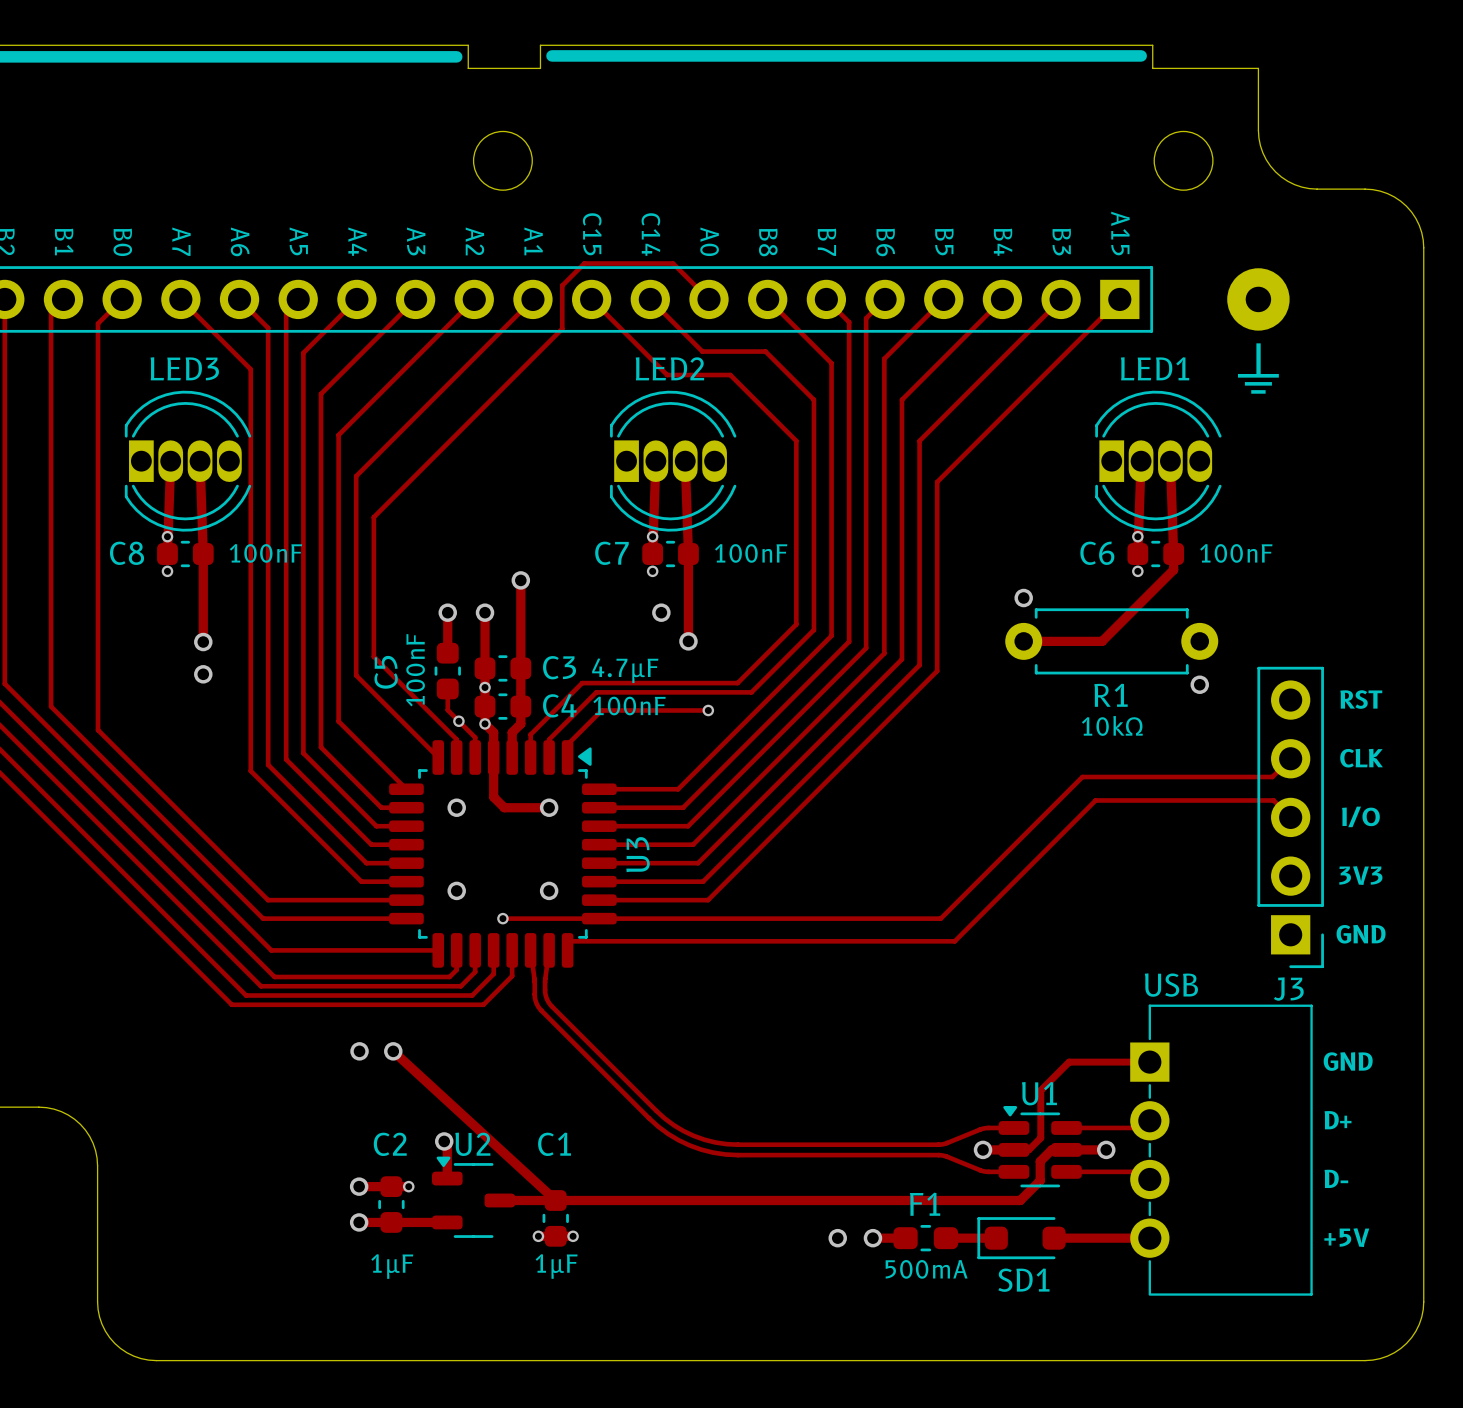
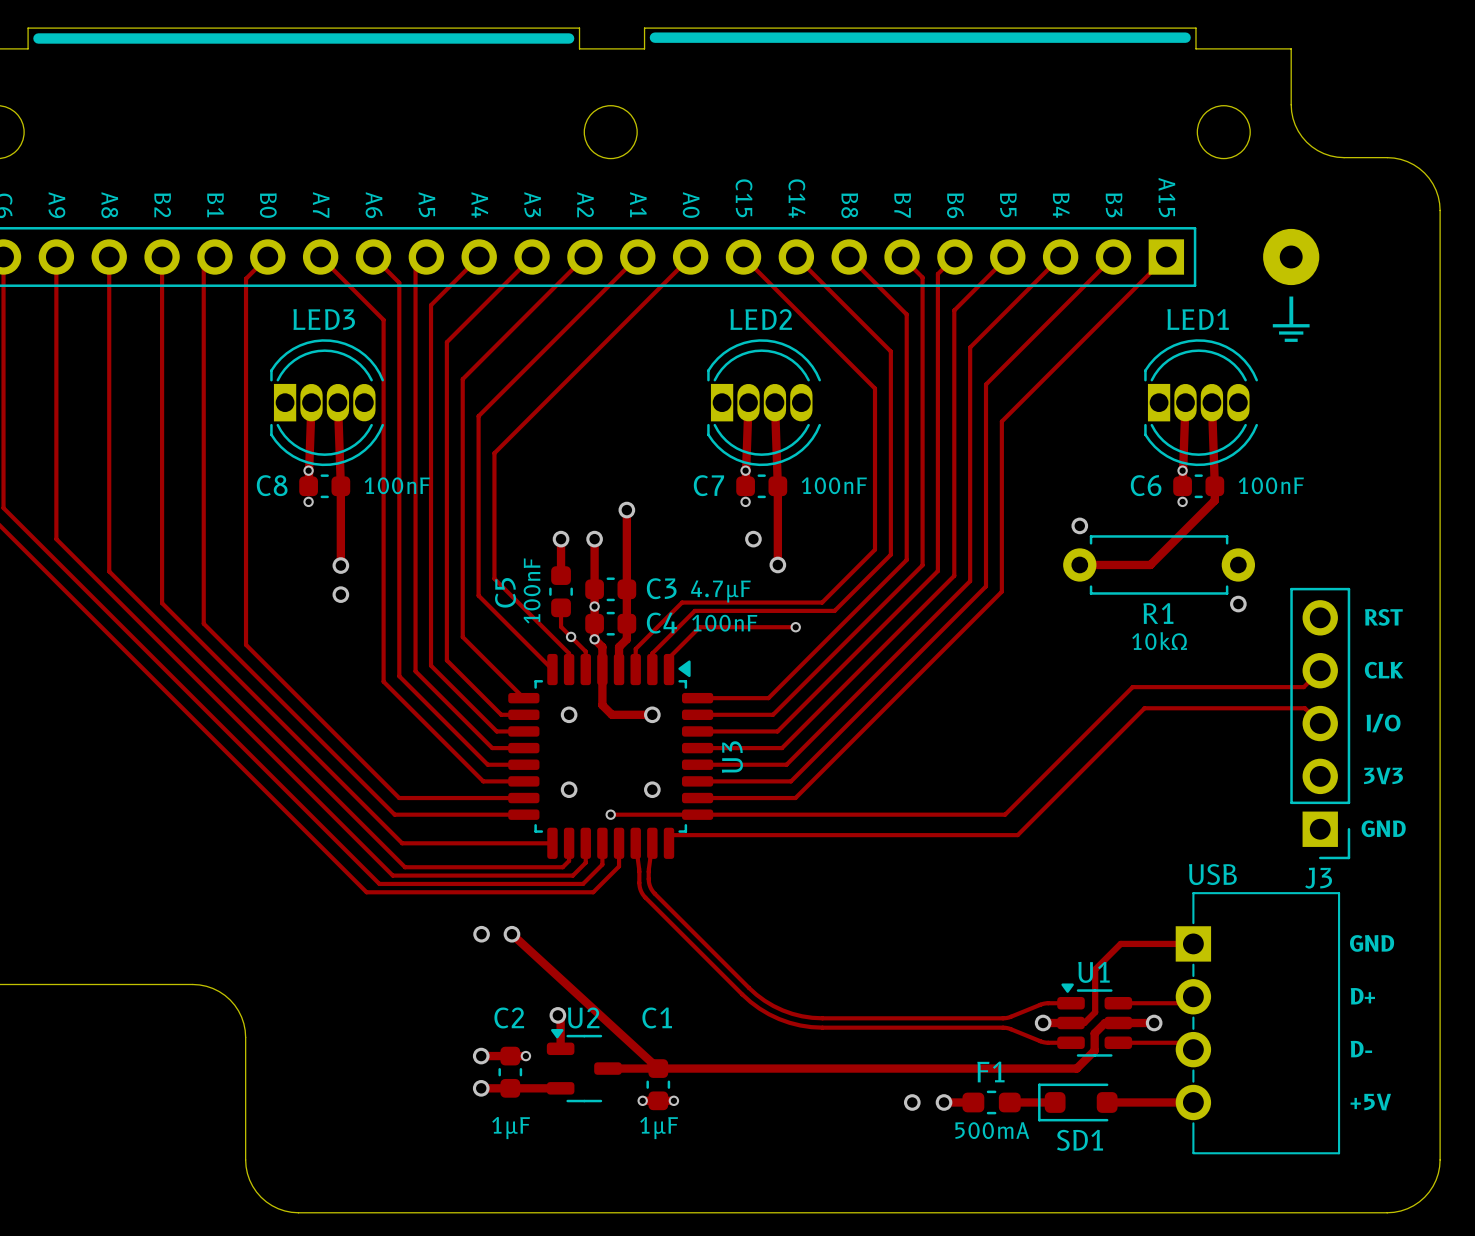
part text: C15 (592, 234) -> A0 (691, 205)
part text: C14 (650, 234) -> C15 (744, 198)
part text: A0 (709, 241) -> C14 (796, 198)
track: (591, 299) (667, 375) (730, 375) (796, 440) (796, 445) -> none
track: (709, 299) (673, 263) (584, 263) (562, 285) (562, 328) -> (690, 256) (664, 283)
track: none -> (796, 256) (890, 351)
track: (702, 351) (765, 351) (813, 399) (813, 404) -> (790, 303) (875, 388)

